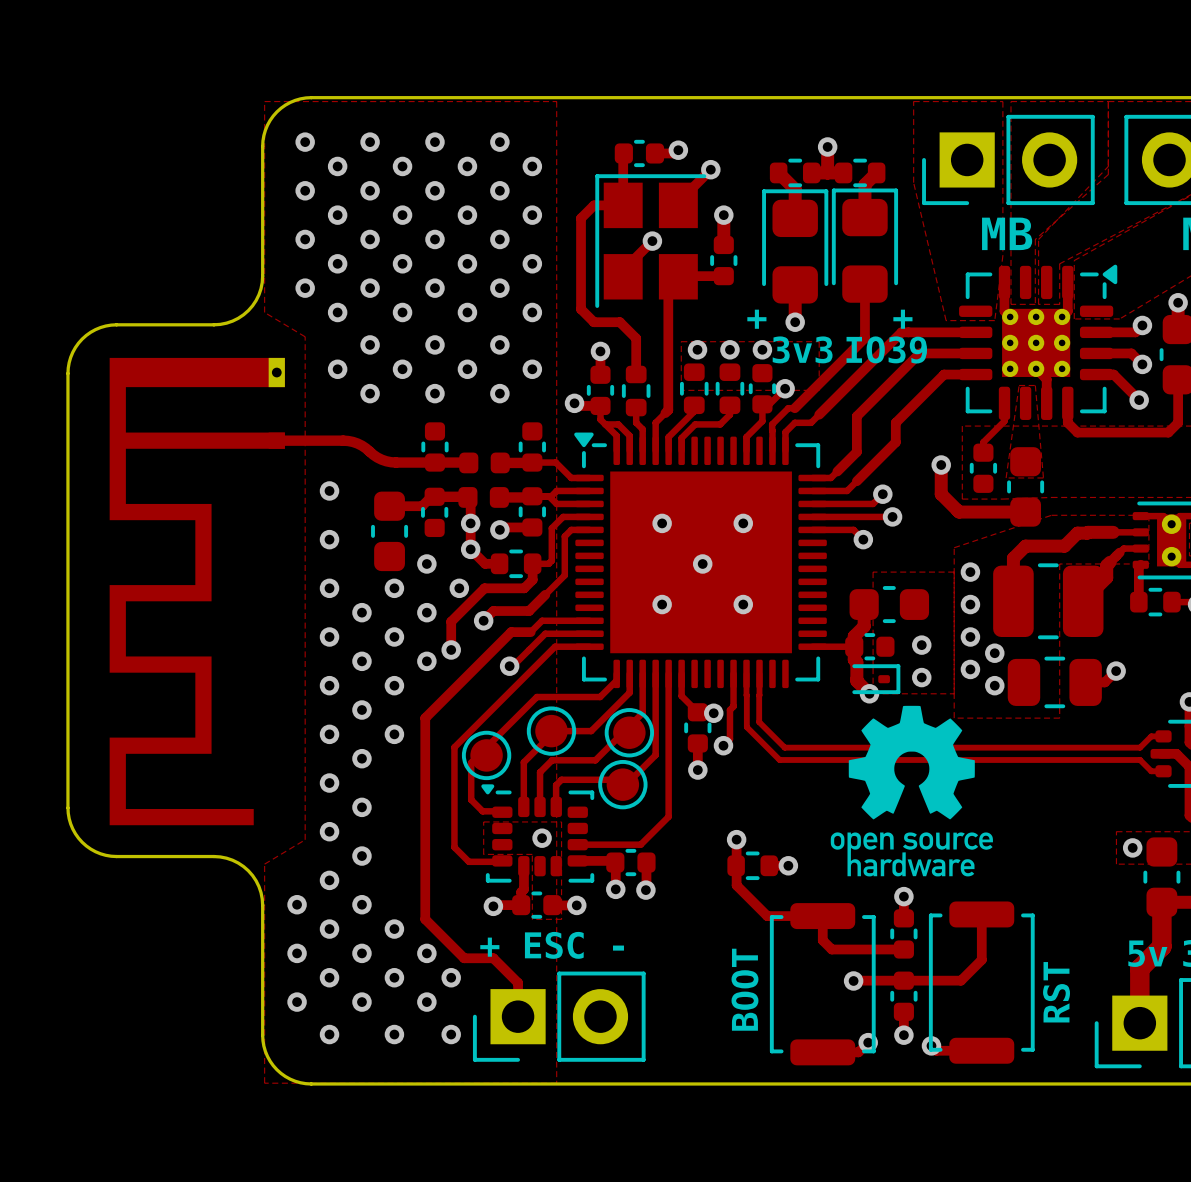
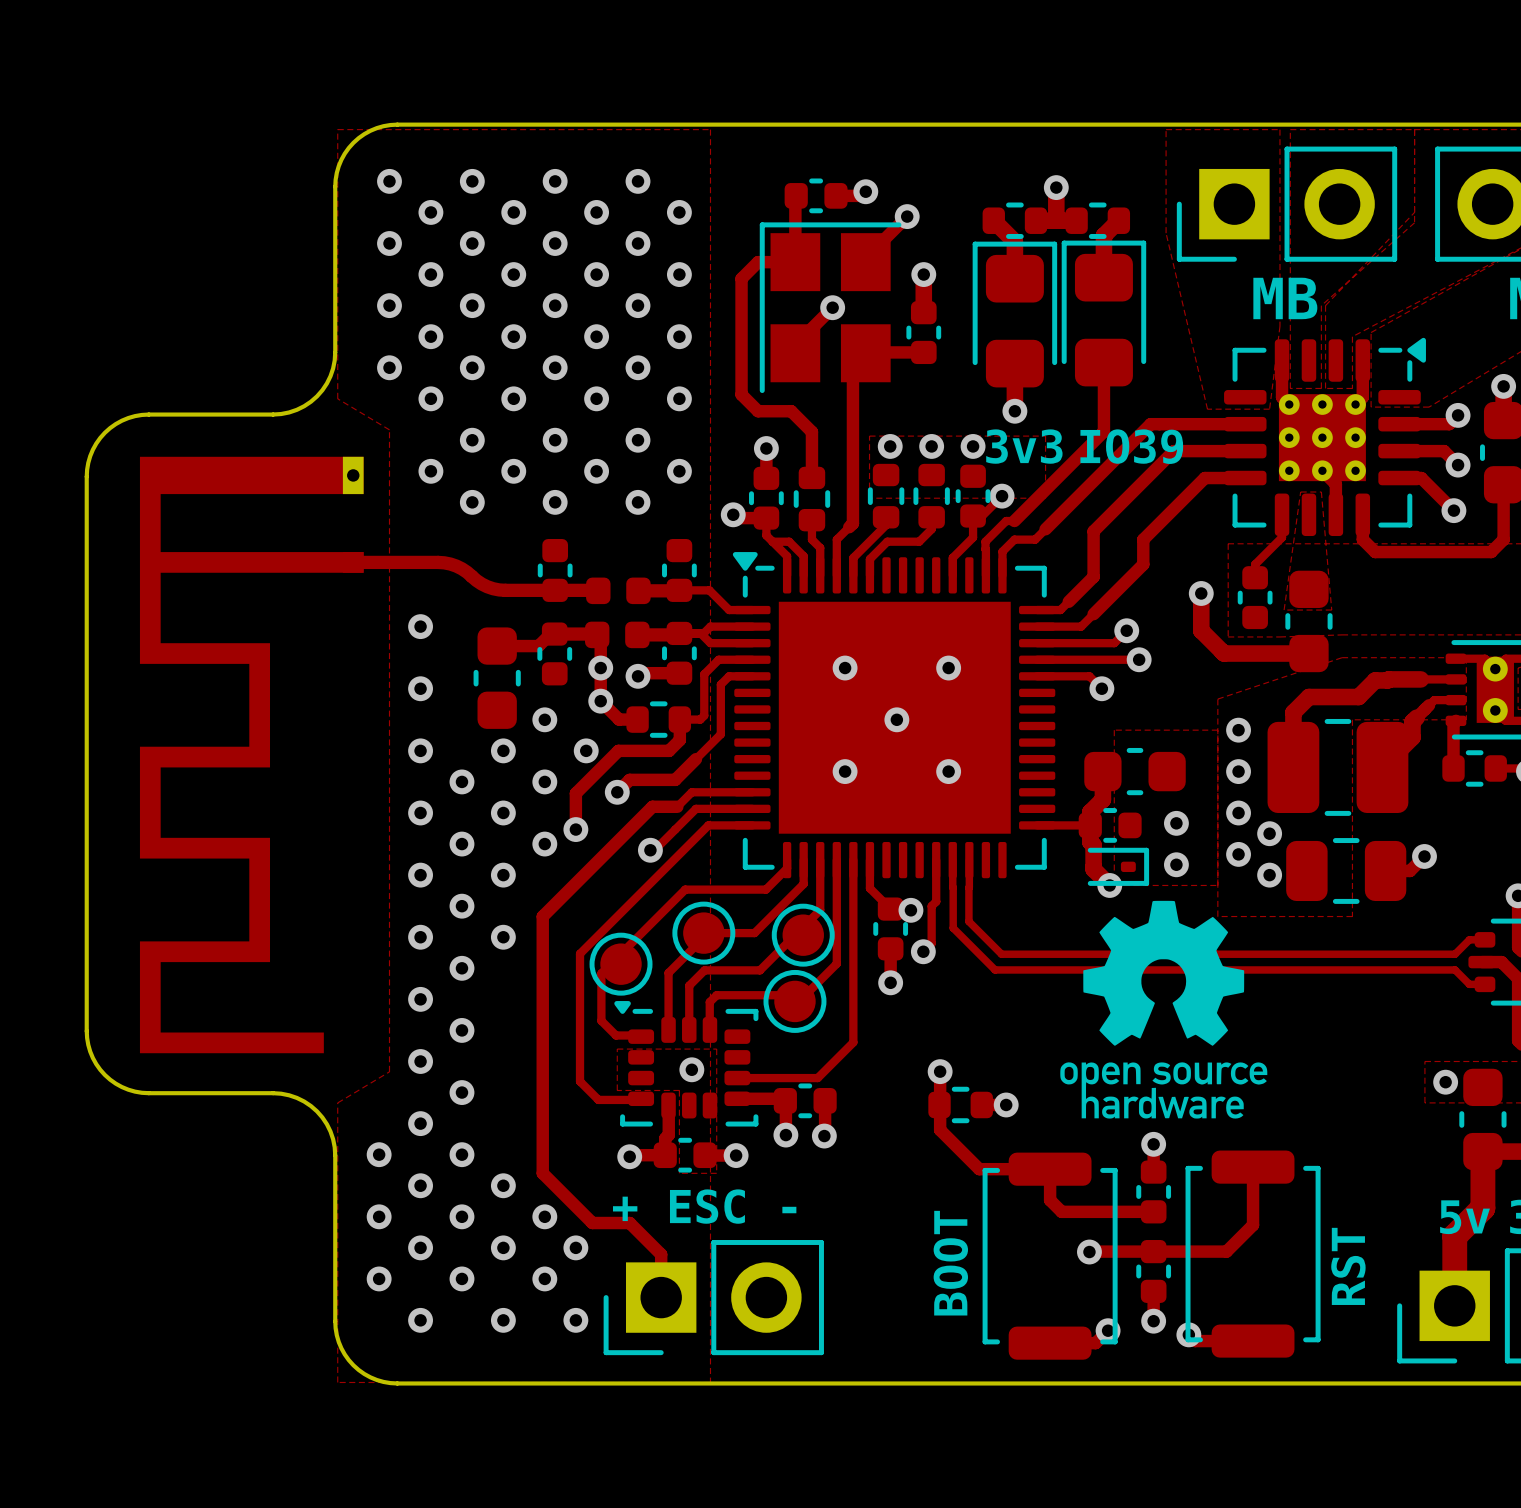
text: + (756, 319) -> none
text: + (902, 319) -> none

